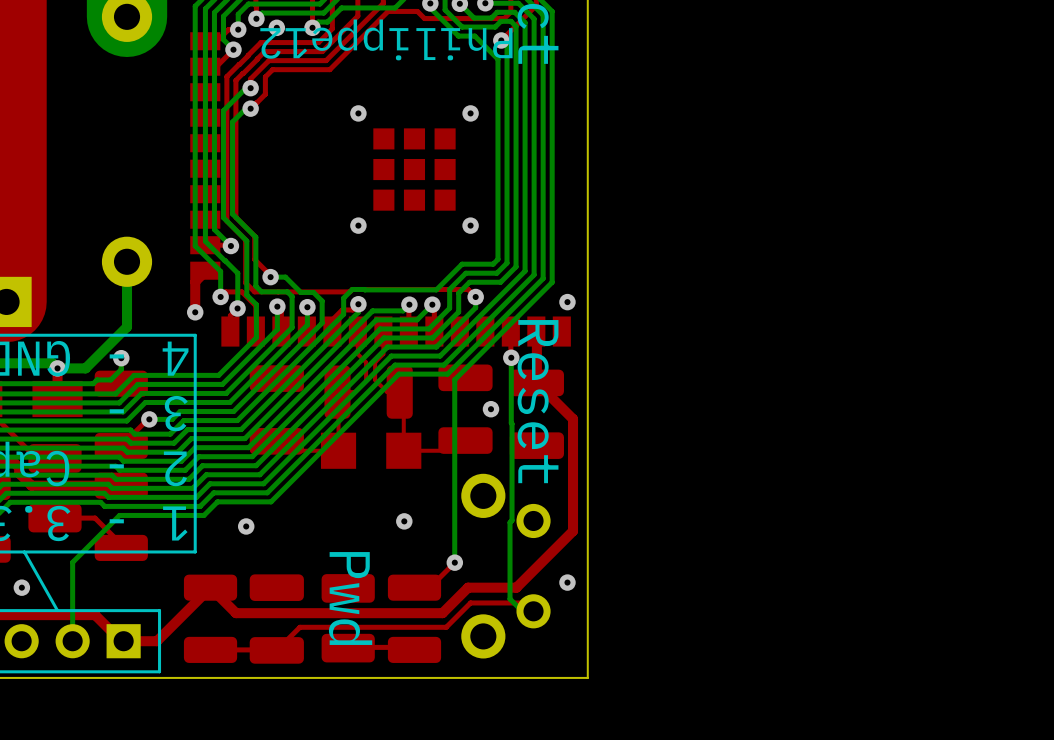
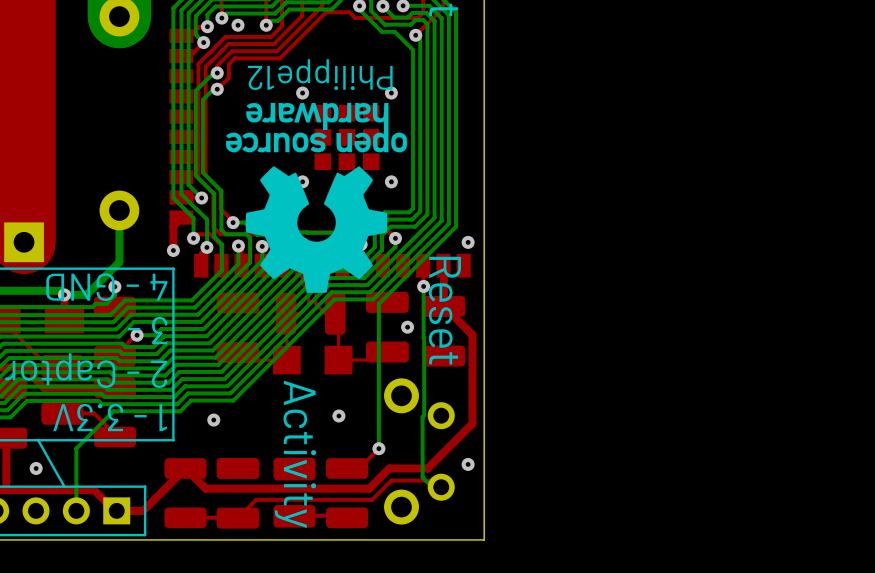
text position: Philippe12 (386, 39) -> Philippe12 (320, 74)
drawing: none -> [225, 102, 408, 293]
text: none -> Activity (295, 454)
text: Pwd (350, 598) -> none

